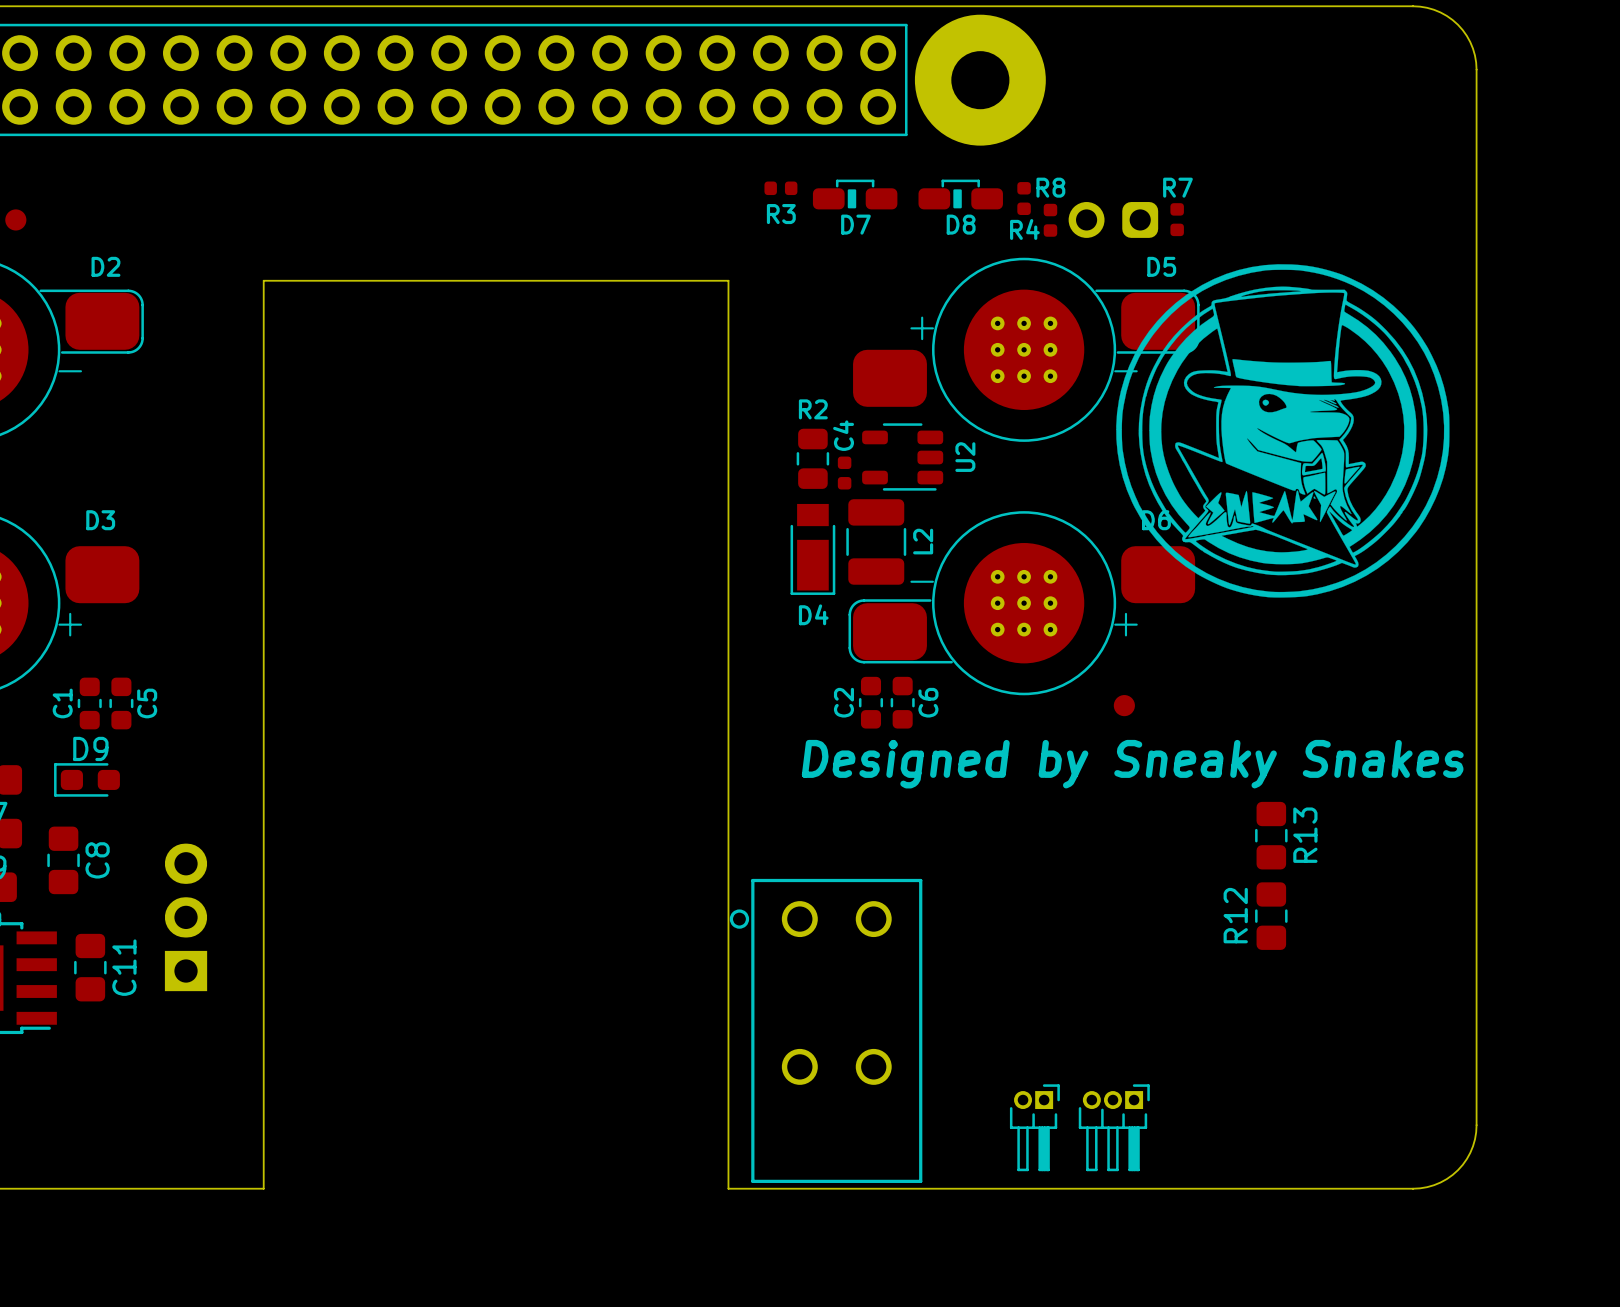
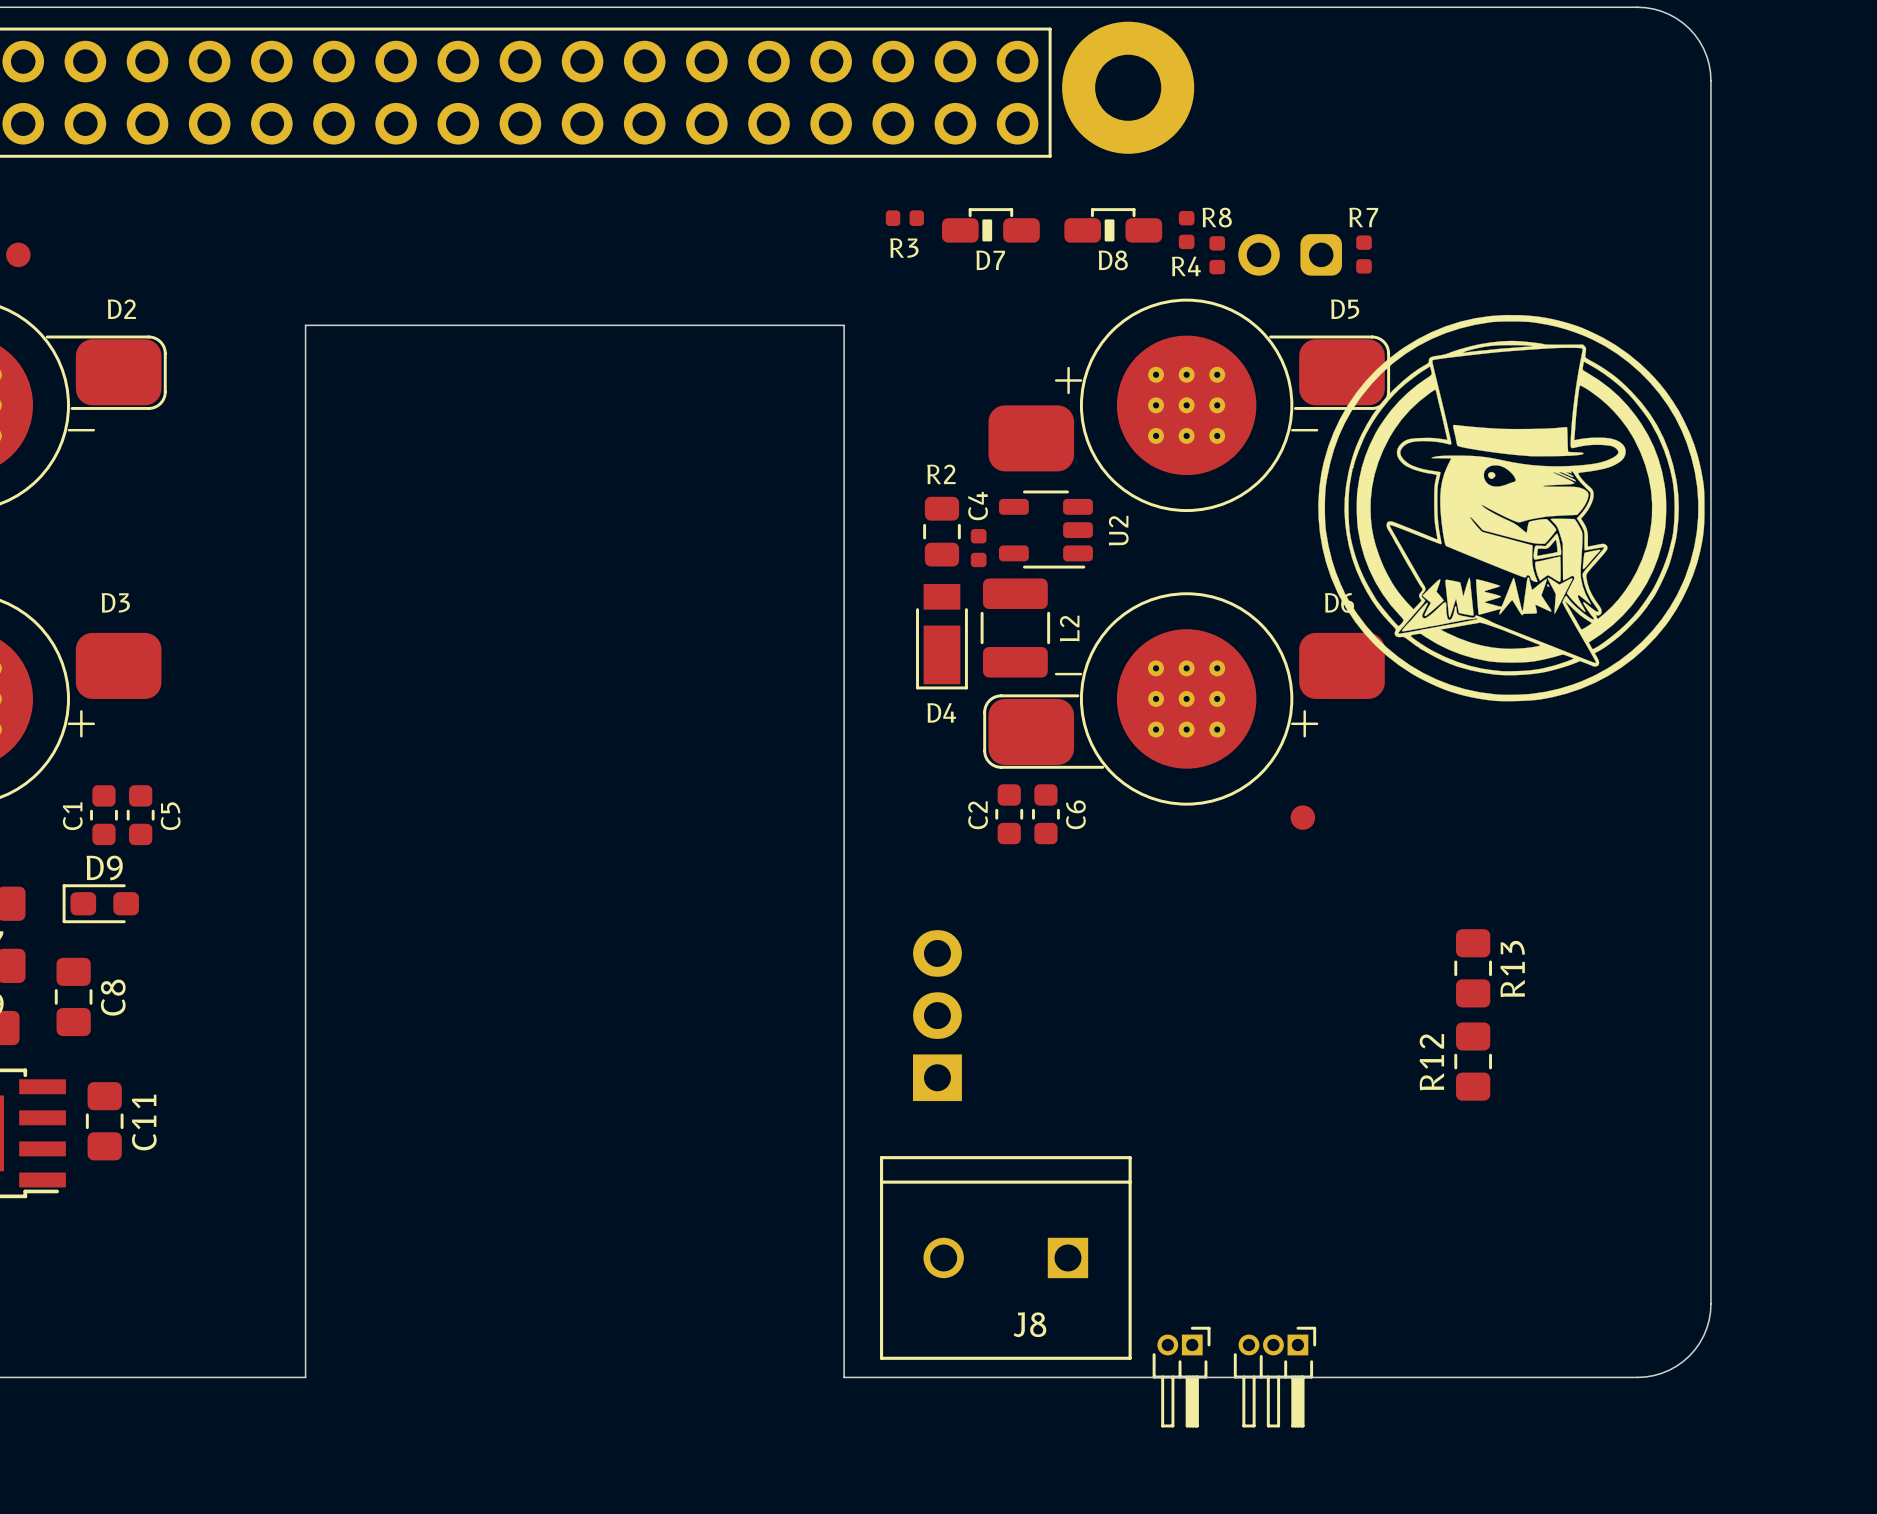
part footprint: [914, 14, 1046, 146] -> [1062, 21, 1195, 154]
drawing position: (1282, 430) -> (1511, 508)
text: Designed by Sneaky Snakes (1132, 764) -> none
part: none -> (937, 1015)
part: (186, 917) -> none
part: (826, 1030) -> none
J8: none -> (1005, 1257)
part position: (1034, 1127) -> (1181, 1377)
part position: (1114, 1127) -> (1274, 1377)

